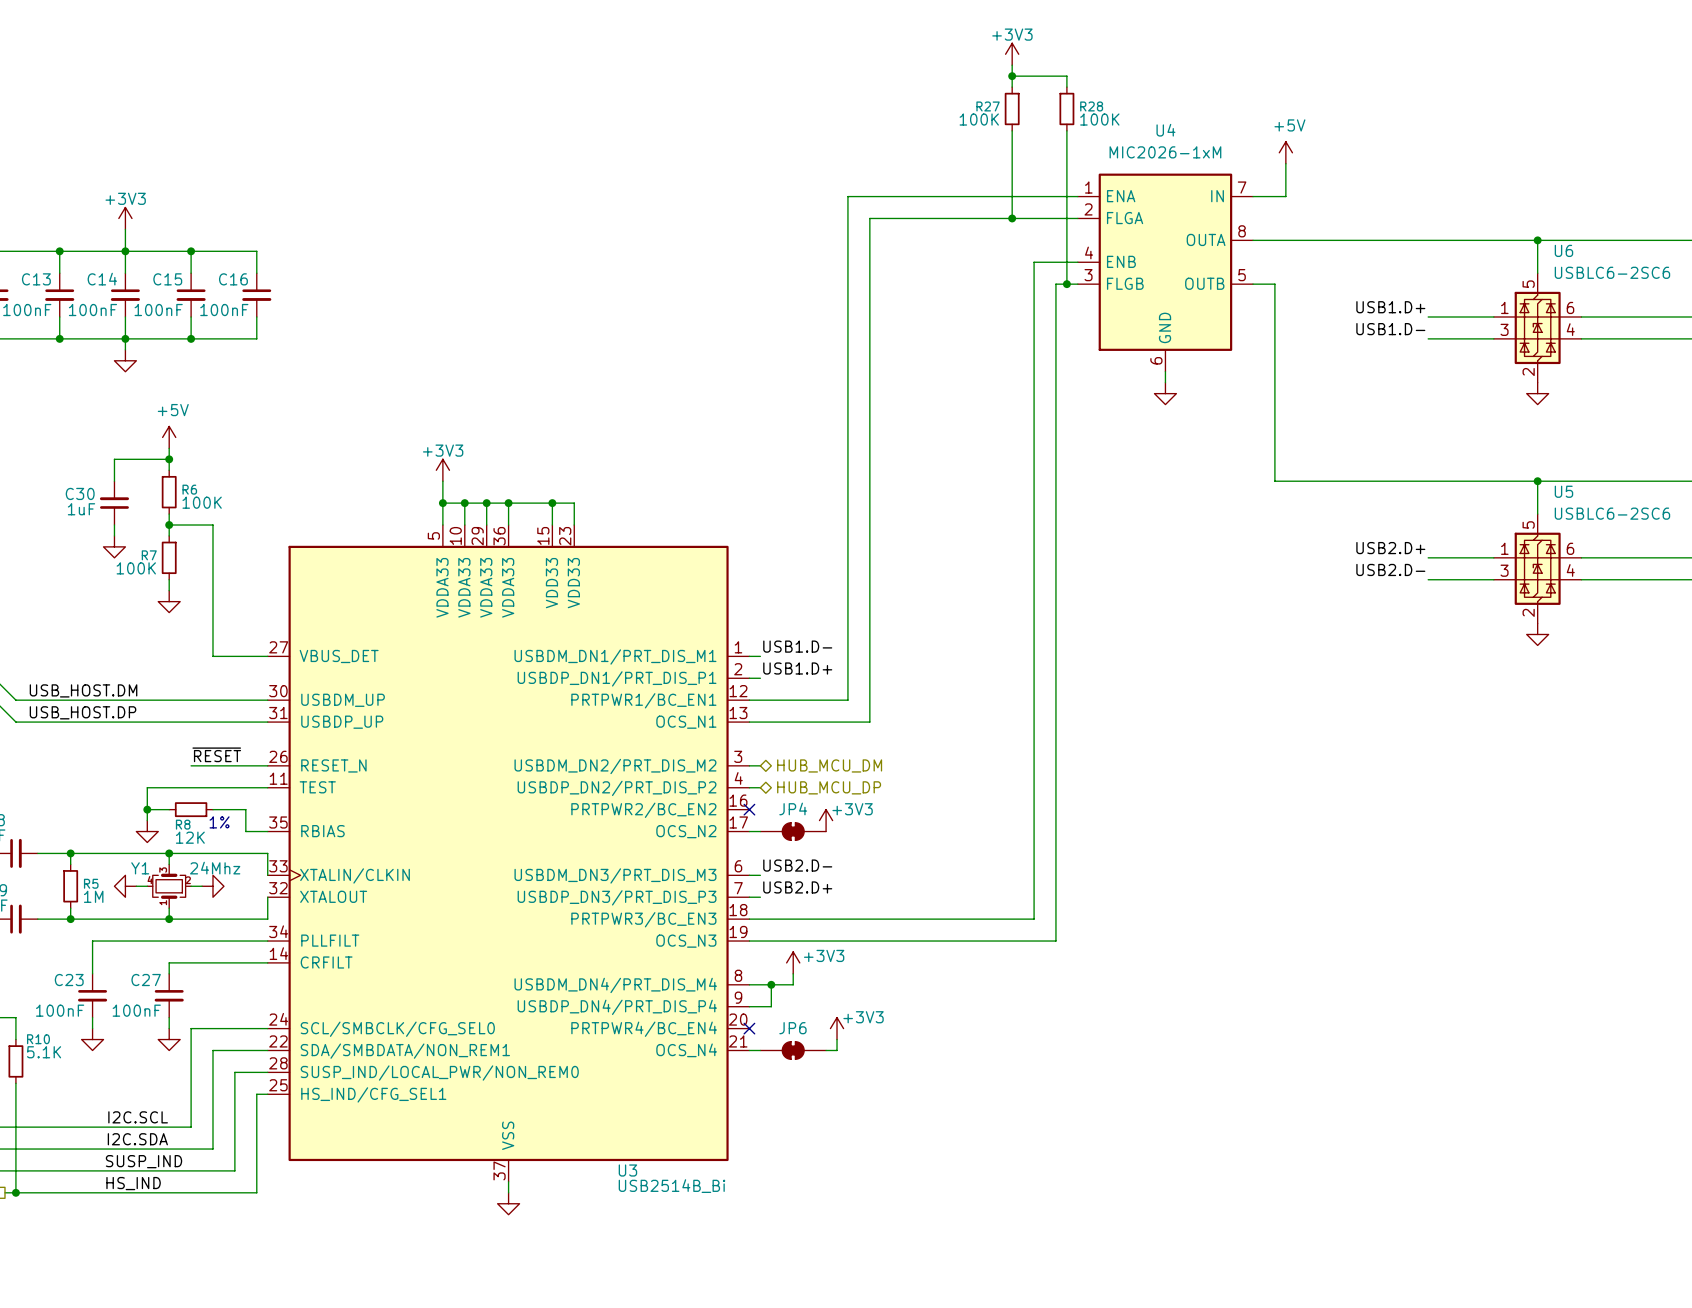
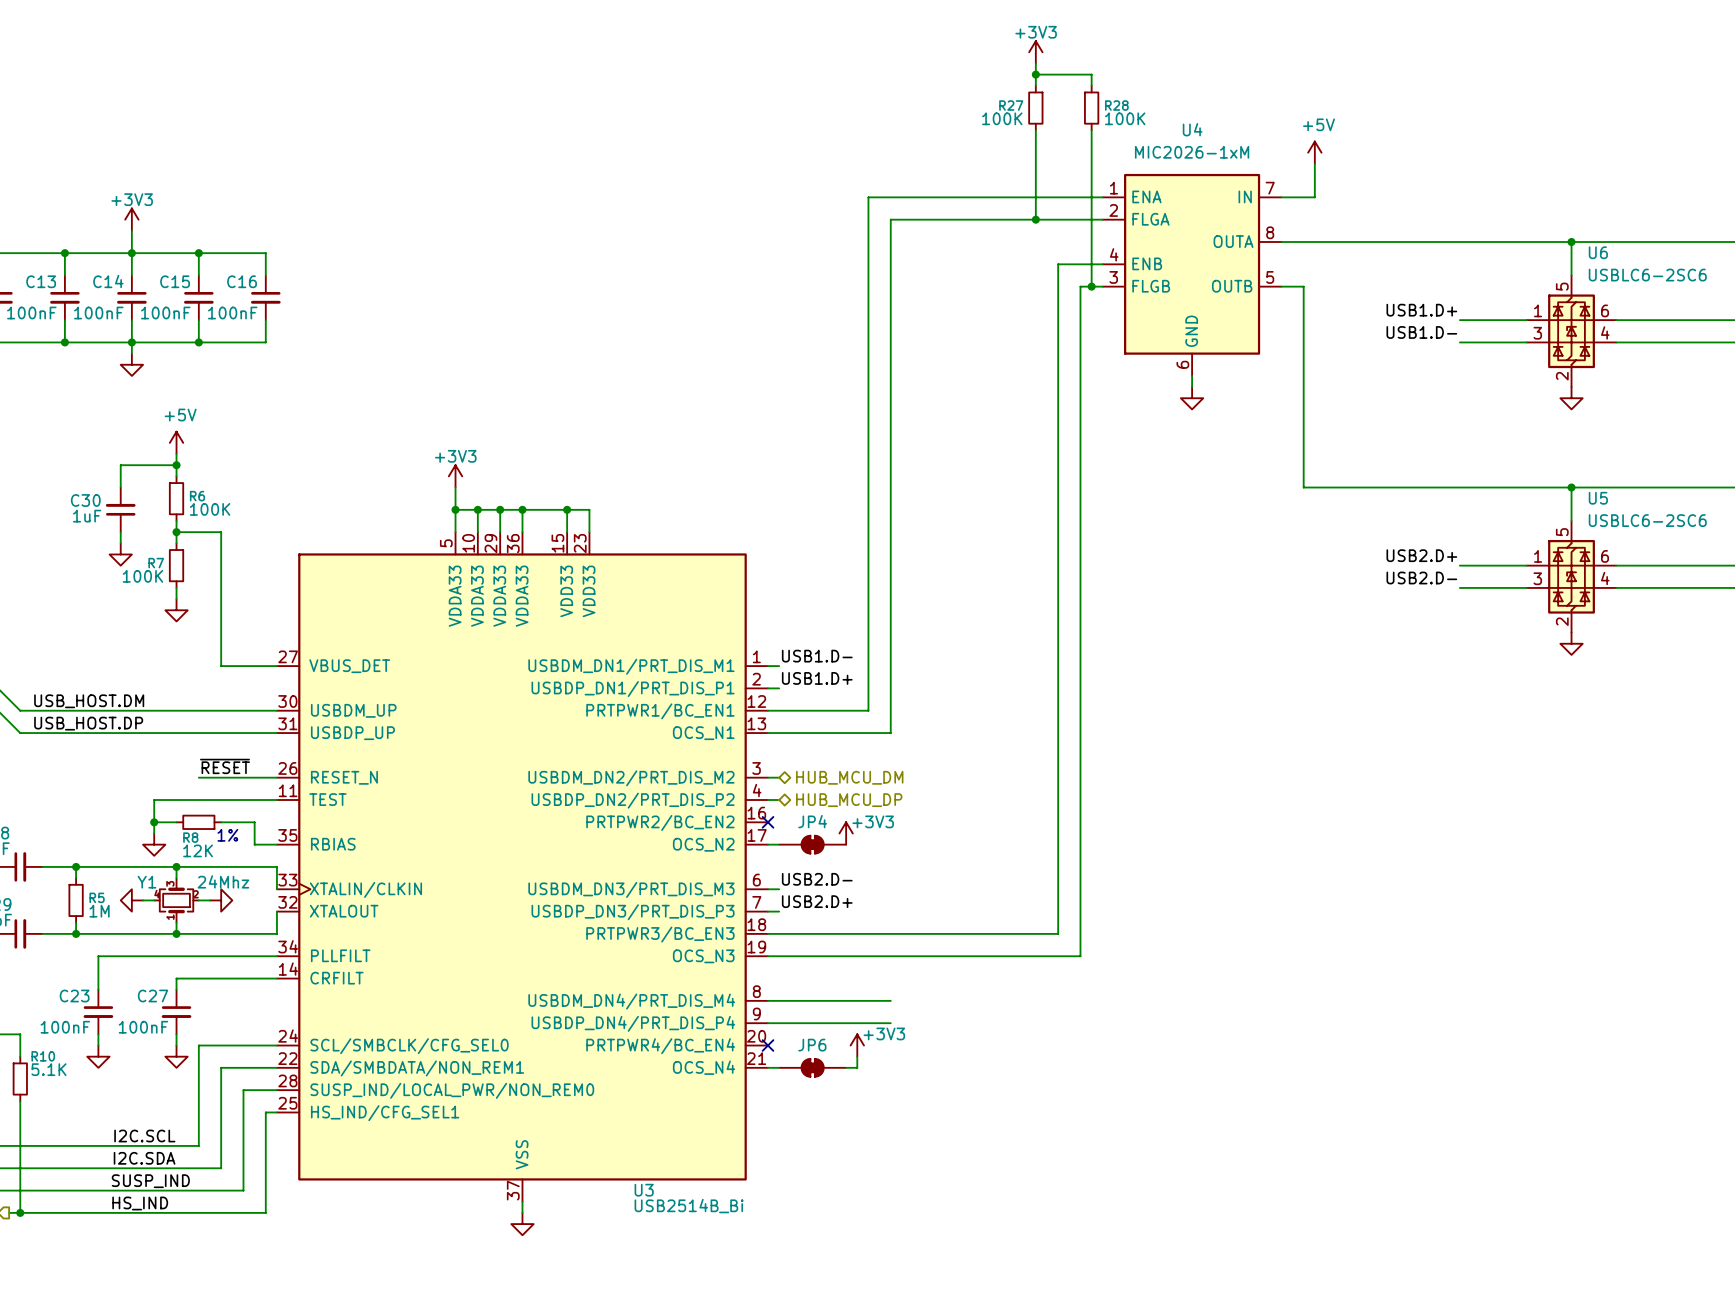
power symbol: +3V3 (793, 962) -> none
wire: (793, 973) (793, 984) -> (890, 1000) (812, 1000)
wire: (771, 984) (771, 1006) -> (890, 1023) (790, 1023)
junction: (771, 984) -> none

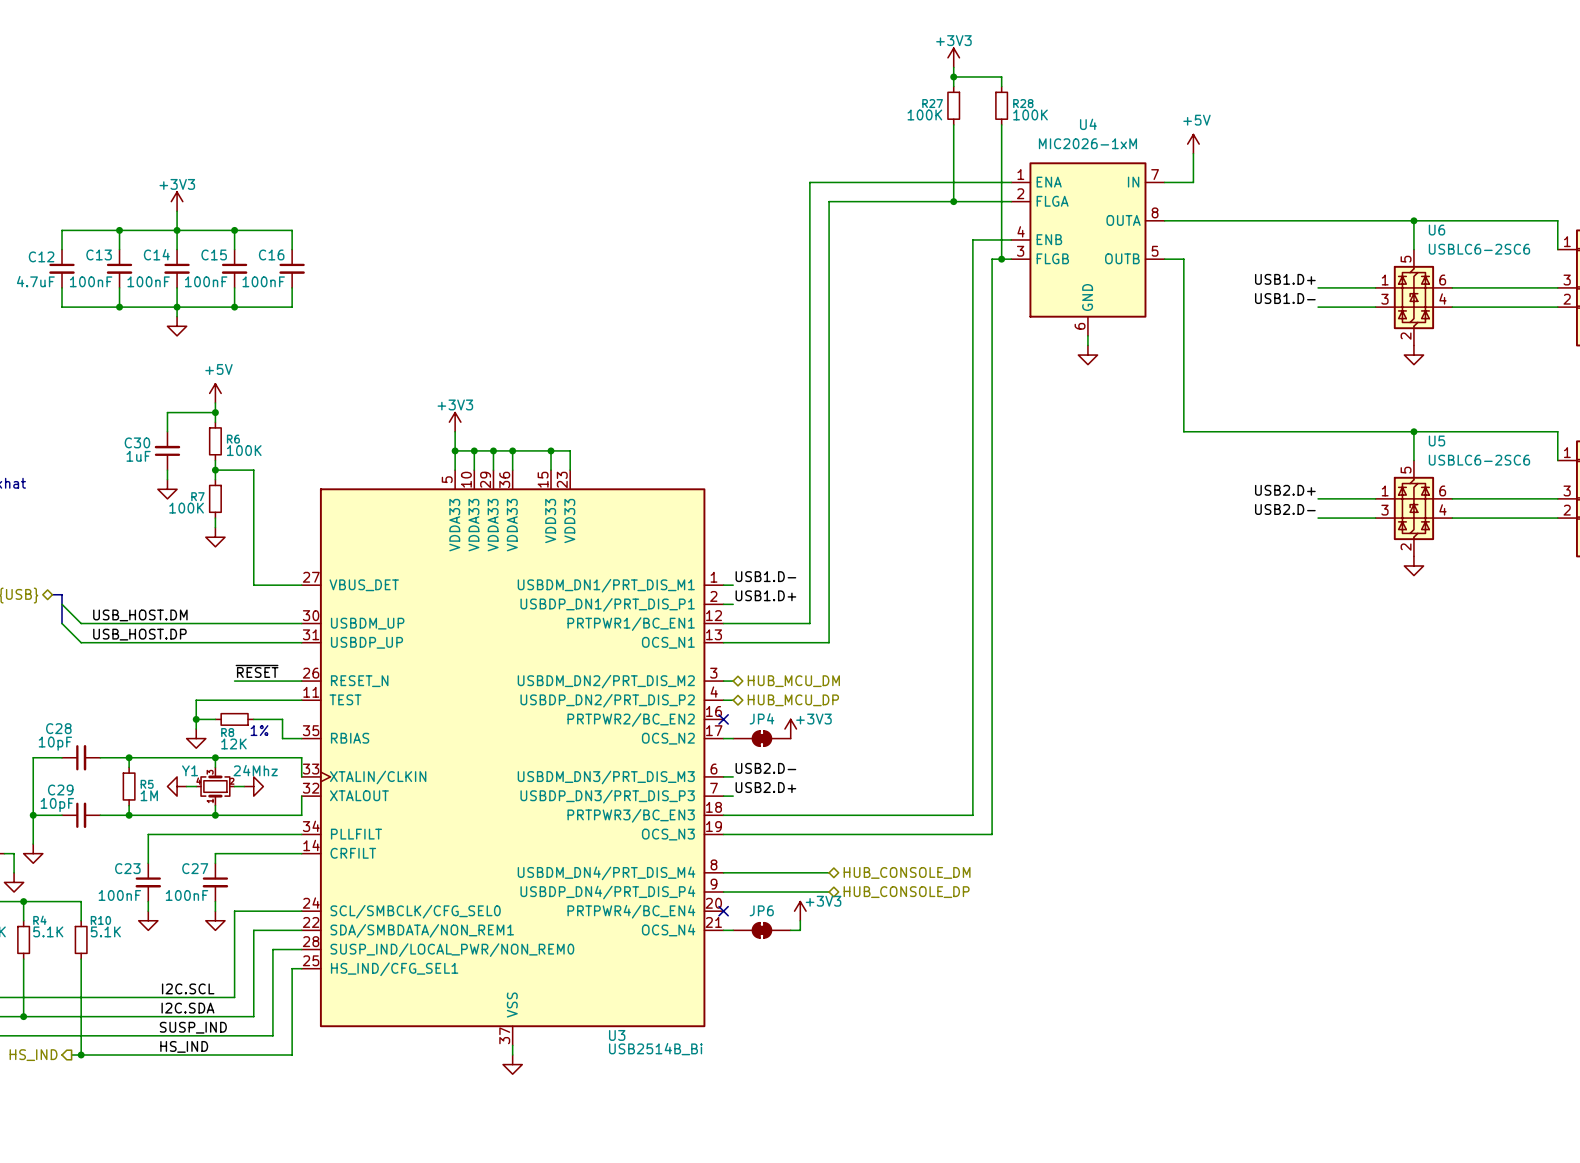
hierarchical label: none -> HUB_CONSOLE_DM (907, 872)
hierarchical label: none -> HUB_CONSOLE_DP (906, 892)

